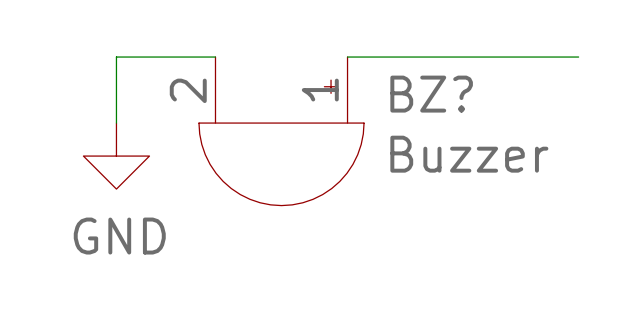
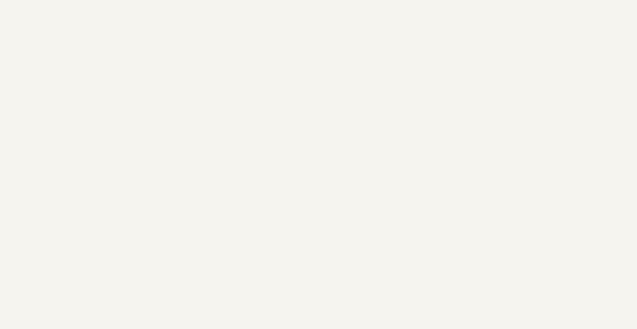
wire: (215, 57) (116, 57) (116, 123) -> none
wire: (347, 57) (578, 57) -> none
BZ?: Buzzer (281, 131) -> none
power symbol: GND (116, 156) -> none

